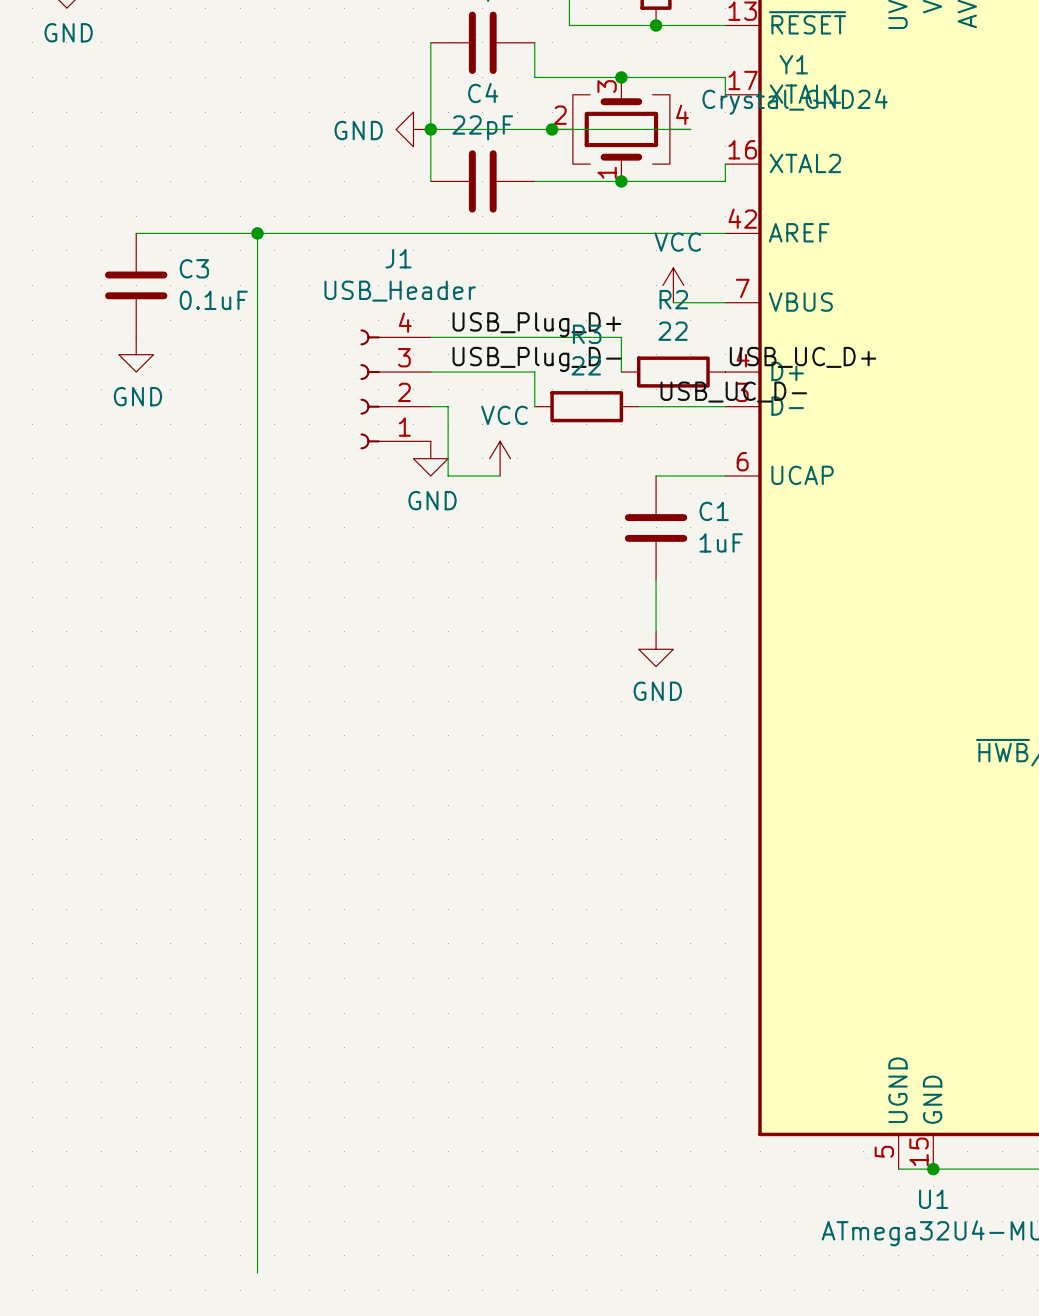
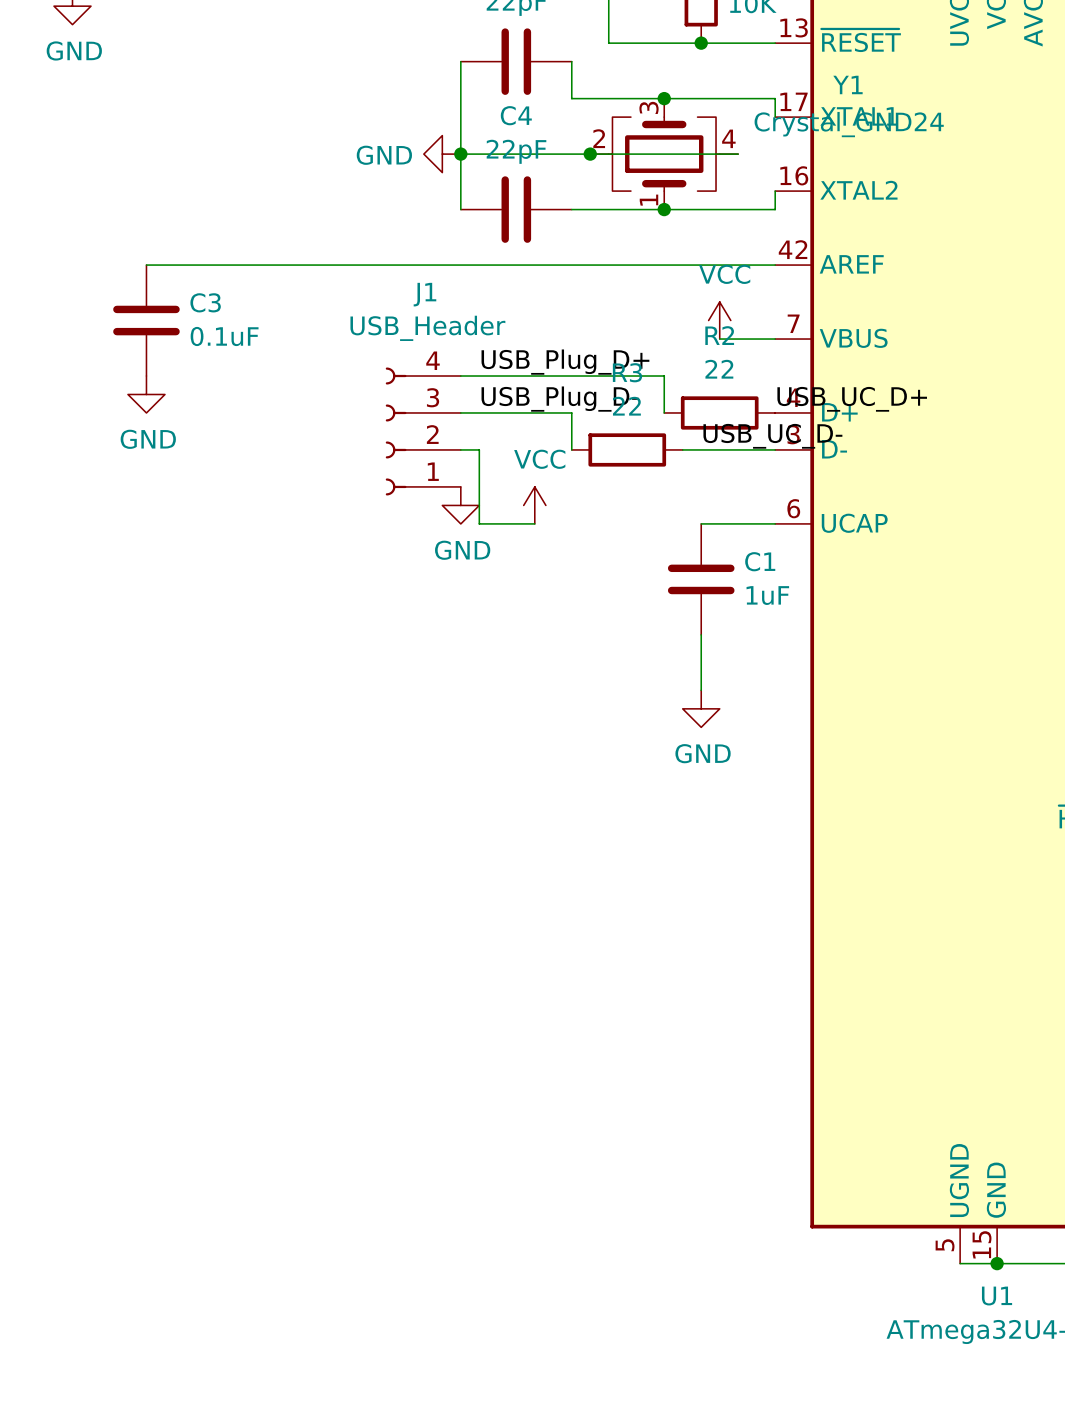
wire: (257, 233) (257, 1273) -> none
junction: (257, 233) -> none

